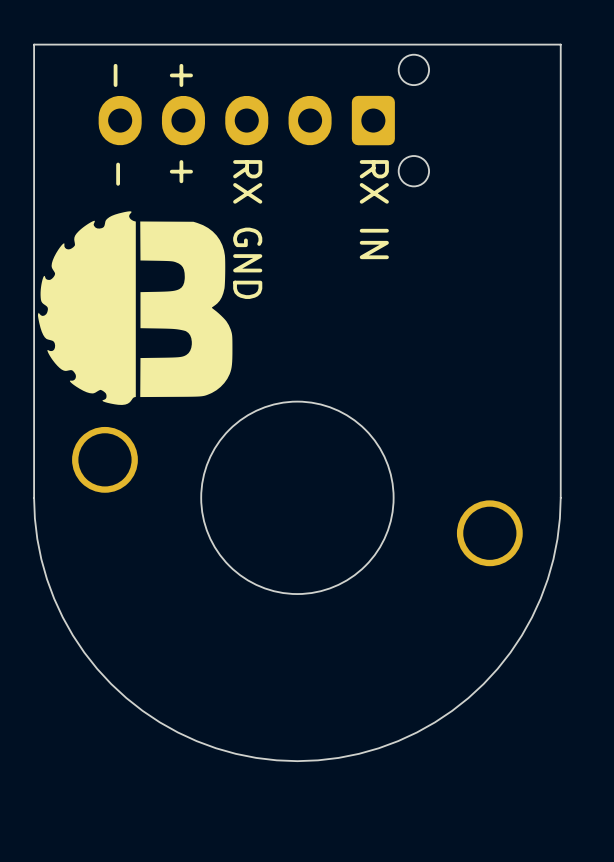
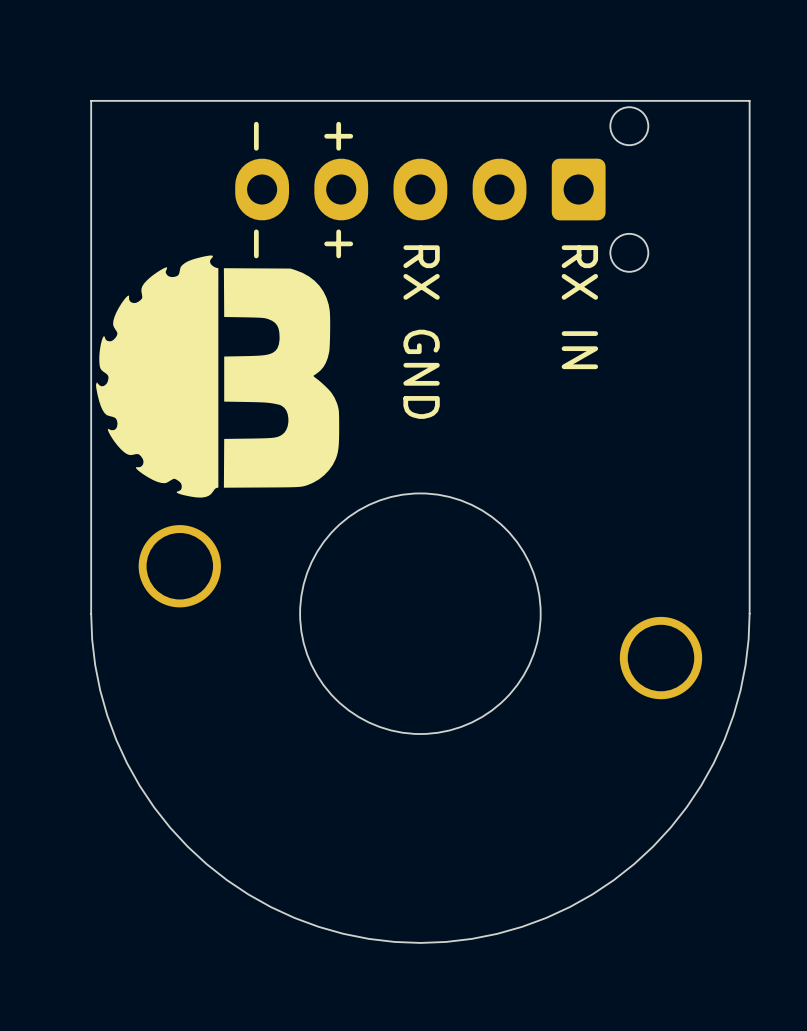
text position: - (115, 75) -> - (256, 136)
text position: + (181, 75) -> + (338, 136)
board edge: (560, 87) (560, 44) (34, 44) (34, 87) -> (749, 100) (91, 100)
part position: (263, 120) -> (441, 189)
text position: + (181, 171) -> + (338, 243)
text position: - (118, 174) -> - (256, 243)
text position: RX IN (374, 209) -> RX IN (579, 307)
text position: RX GND (247, 229) -> RX GND (421, 332)

